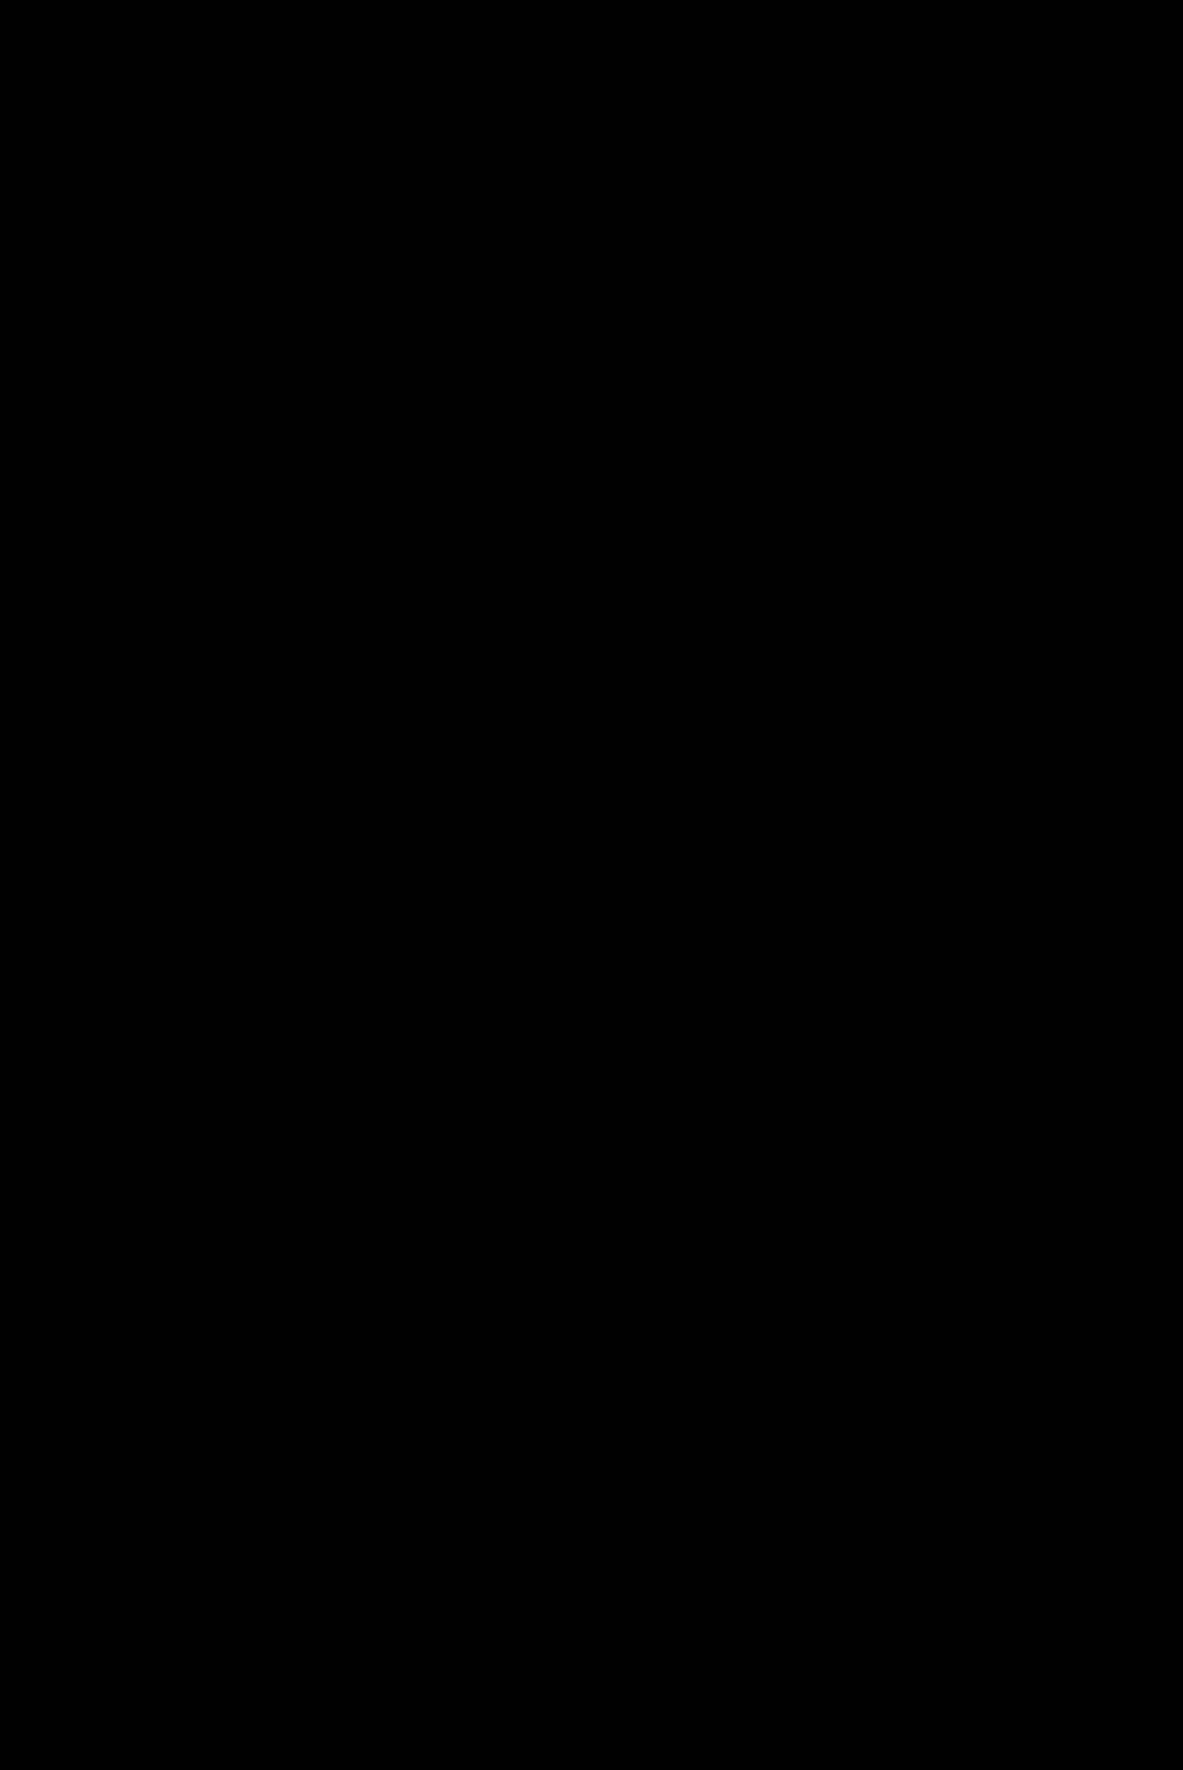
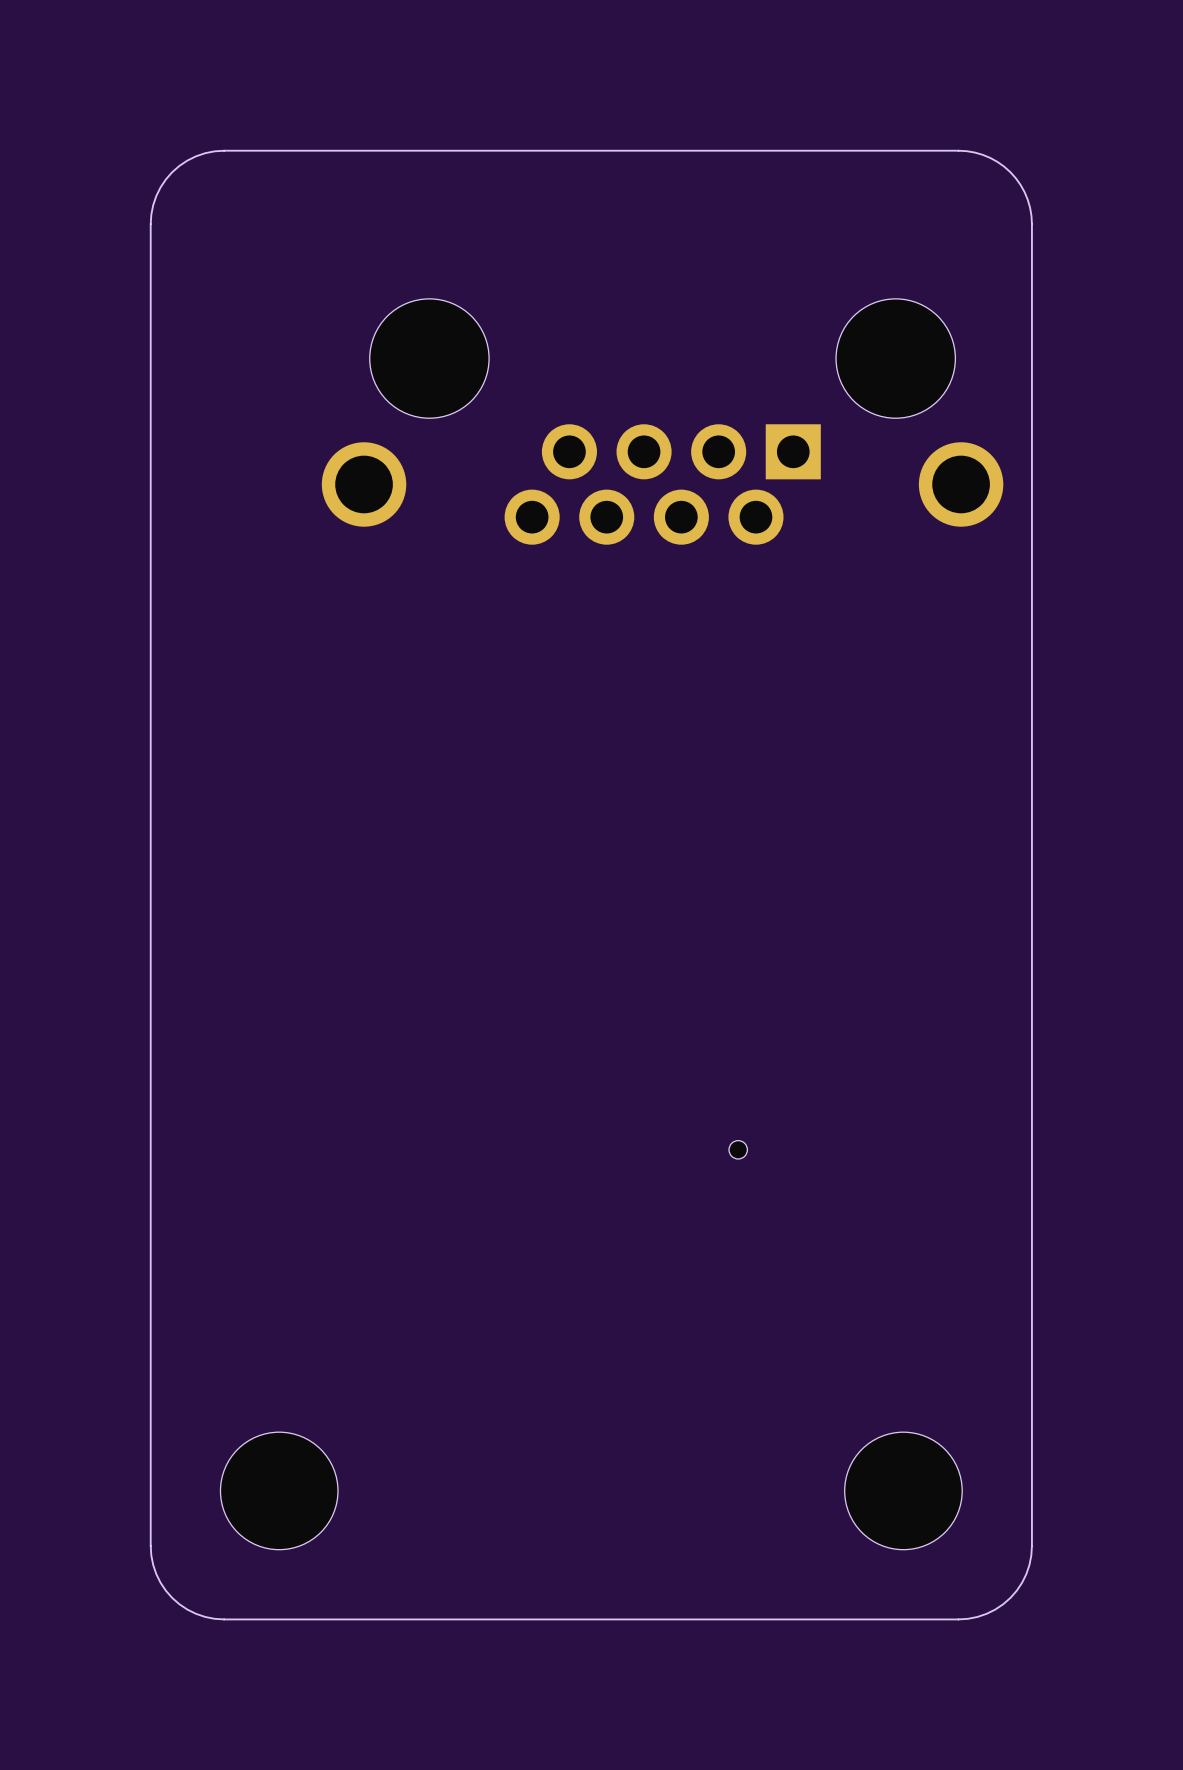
board edge: none -> (958, 150) (224, 150) (205, 153) (187, 160) (172, 172) (160, 187) (153, 205) (150, 224) (150, 1546) (153, 1565) (160, 1582) (172, 1597) (187, 1609) (205, 1616) (224, 1619) (958, 1619) (977, 1616) (995, 1609) (1010, 1597) (1022, 1582) (1029, 1565) (1031, 1546) (1031, 224) (1030, 207) (1024, 192) (1010, 172) (990, 157) (974, 152) (958, 150)
part: none -> (662, 421)
part: none -> (738, 1149)
part: none -> (279, 1490)
part: none -> (903, 1490)

